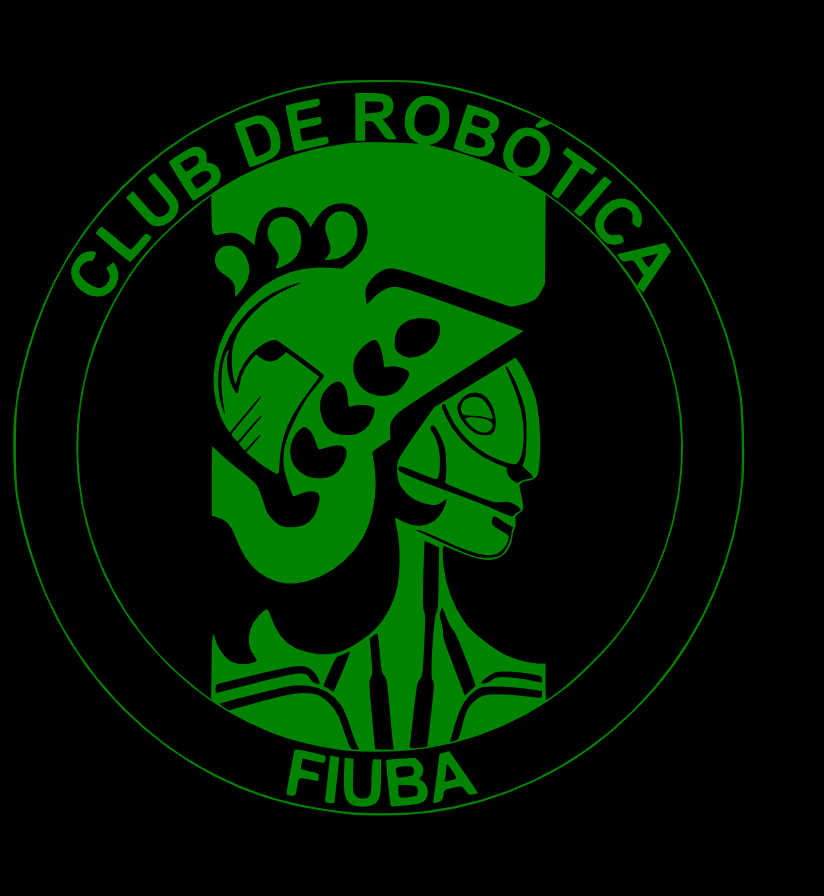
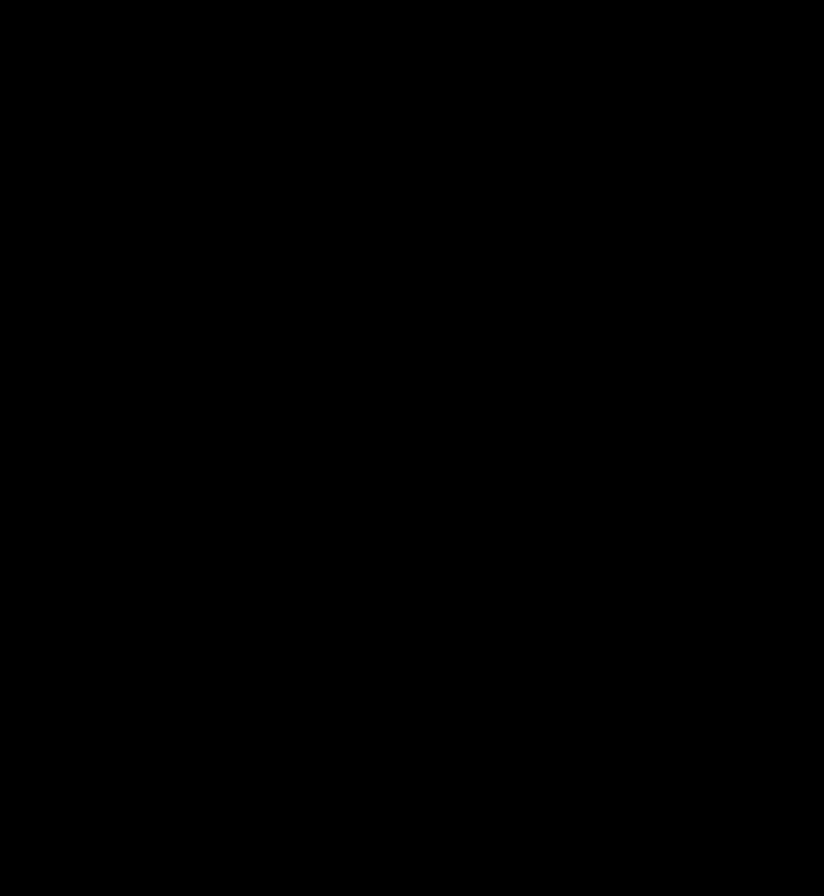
drawing: [13, 80, 745, 816] -> none

